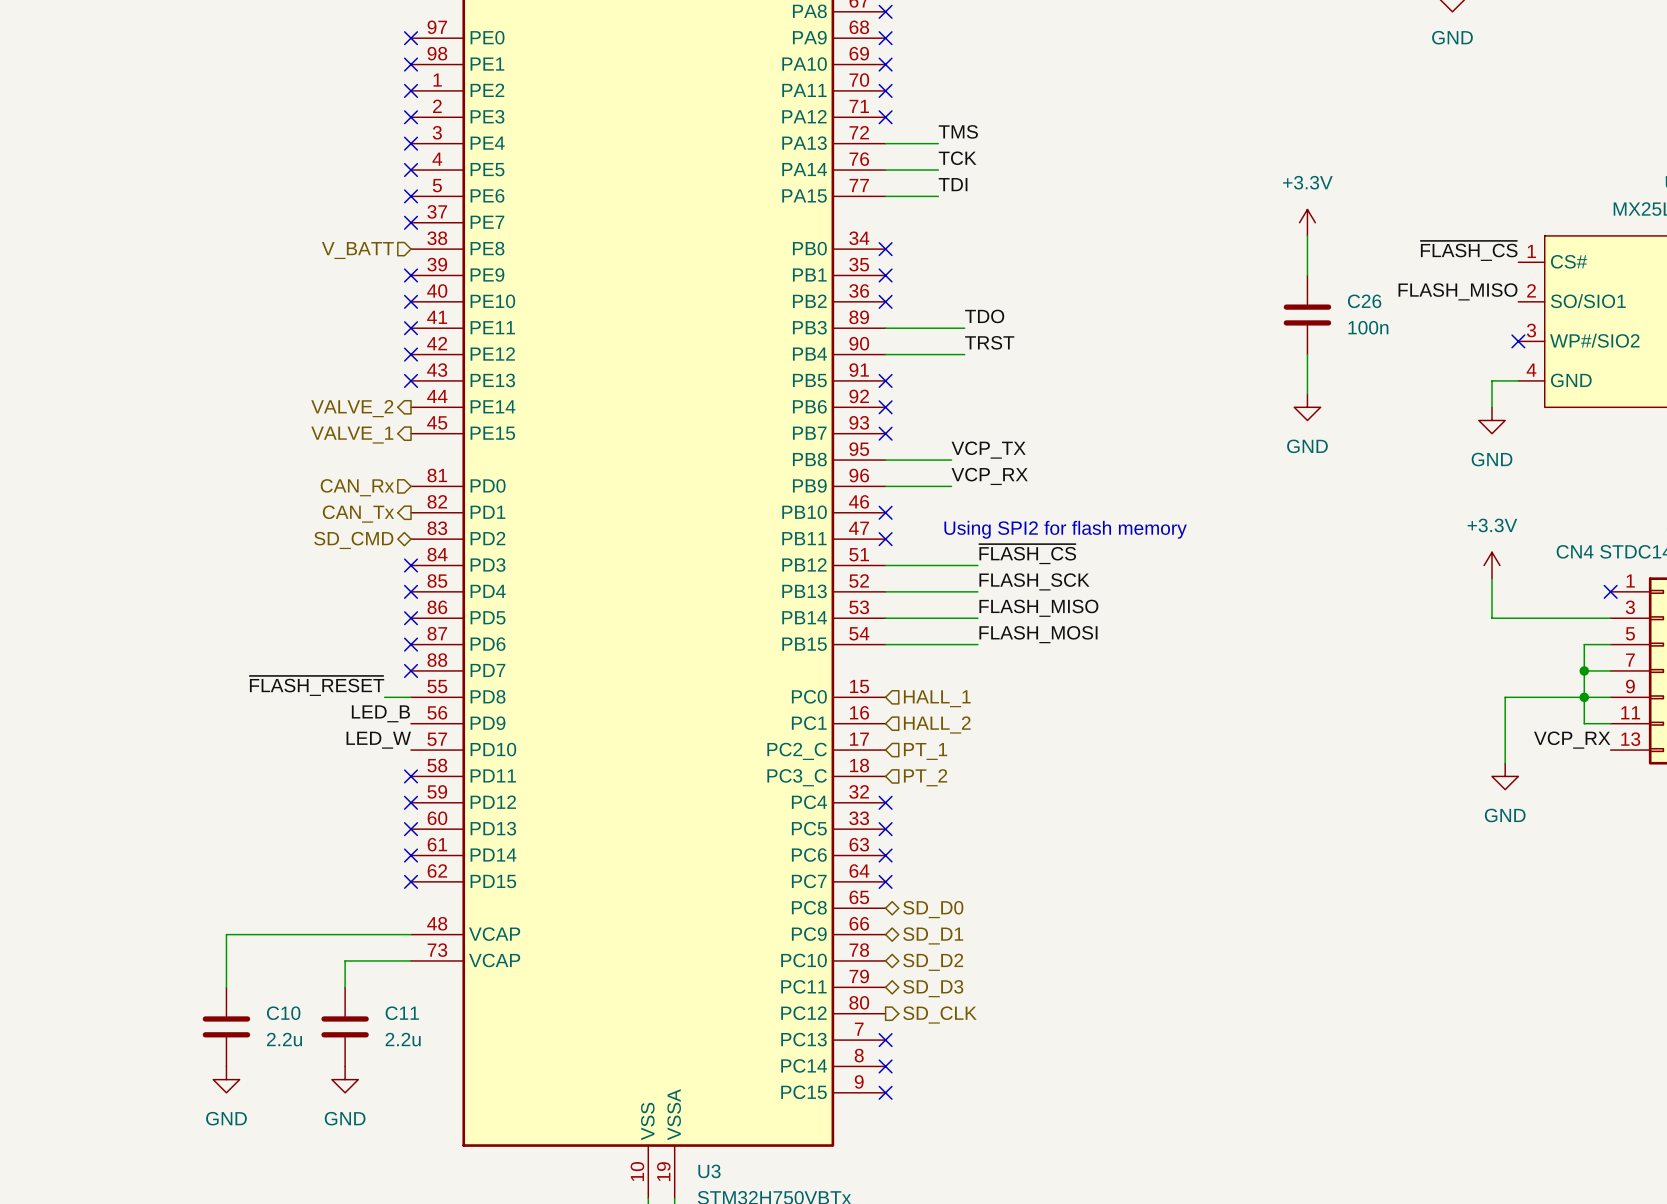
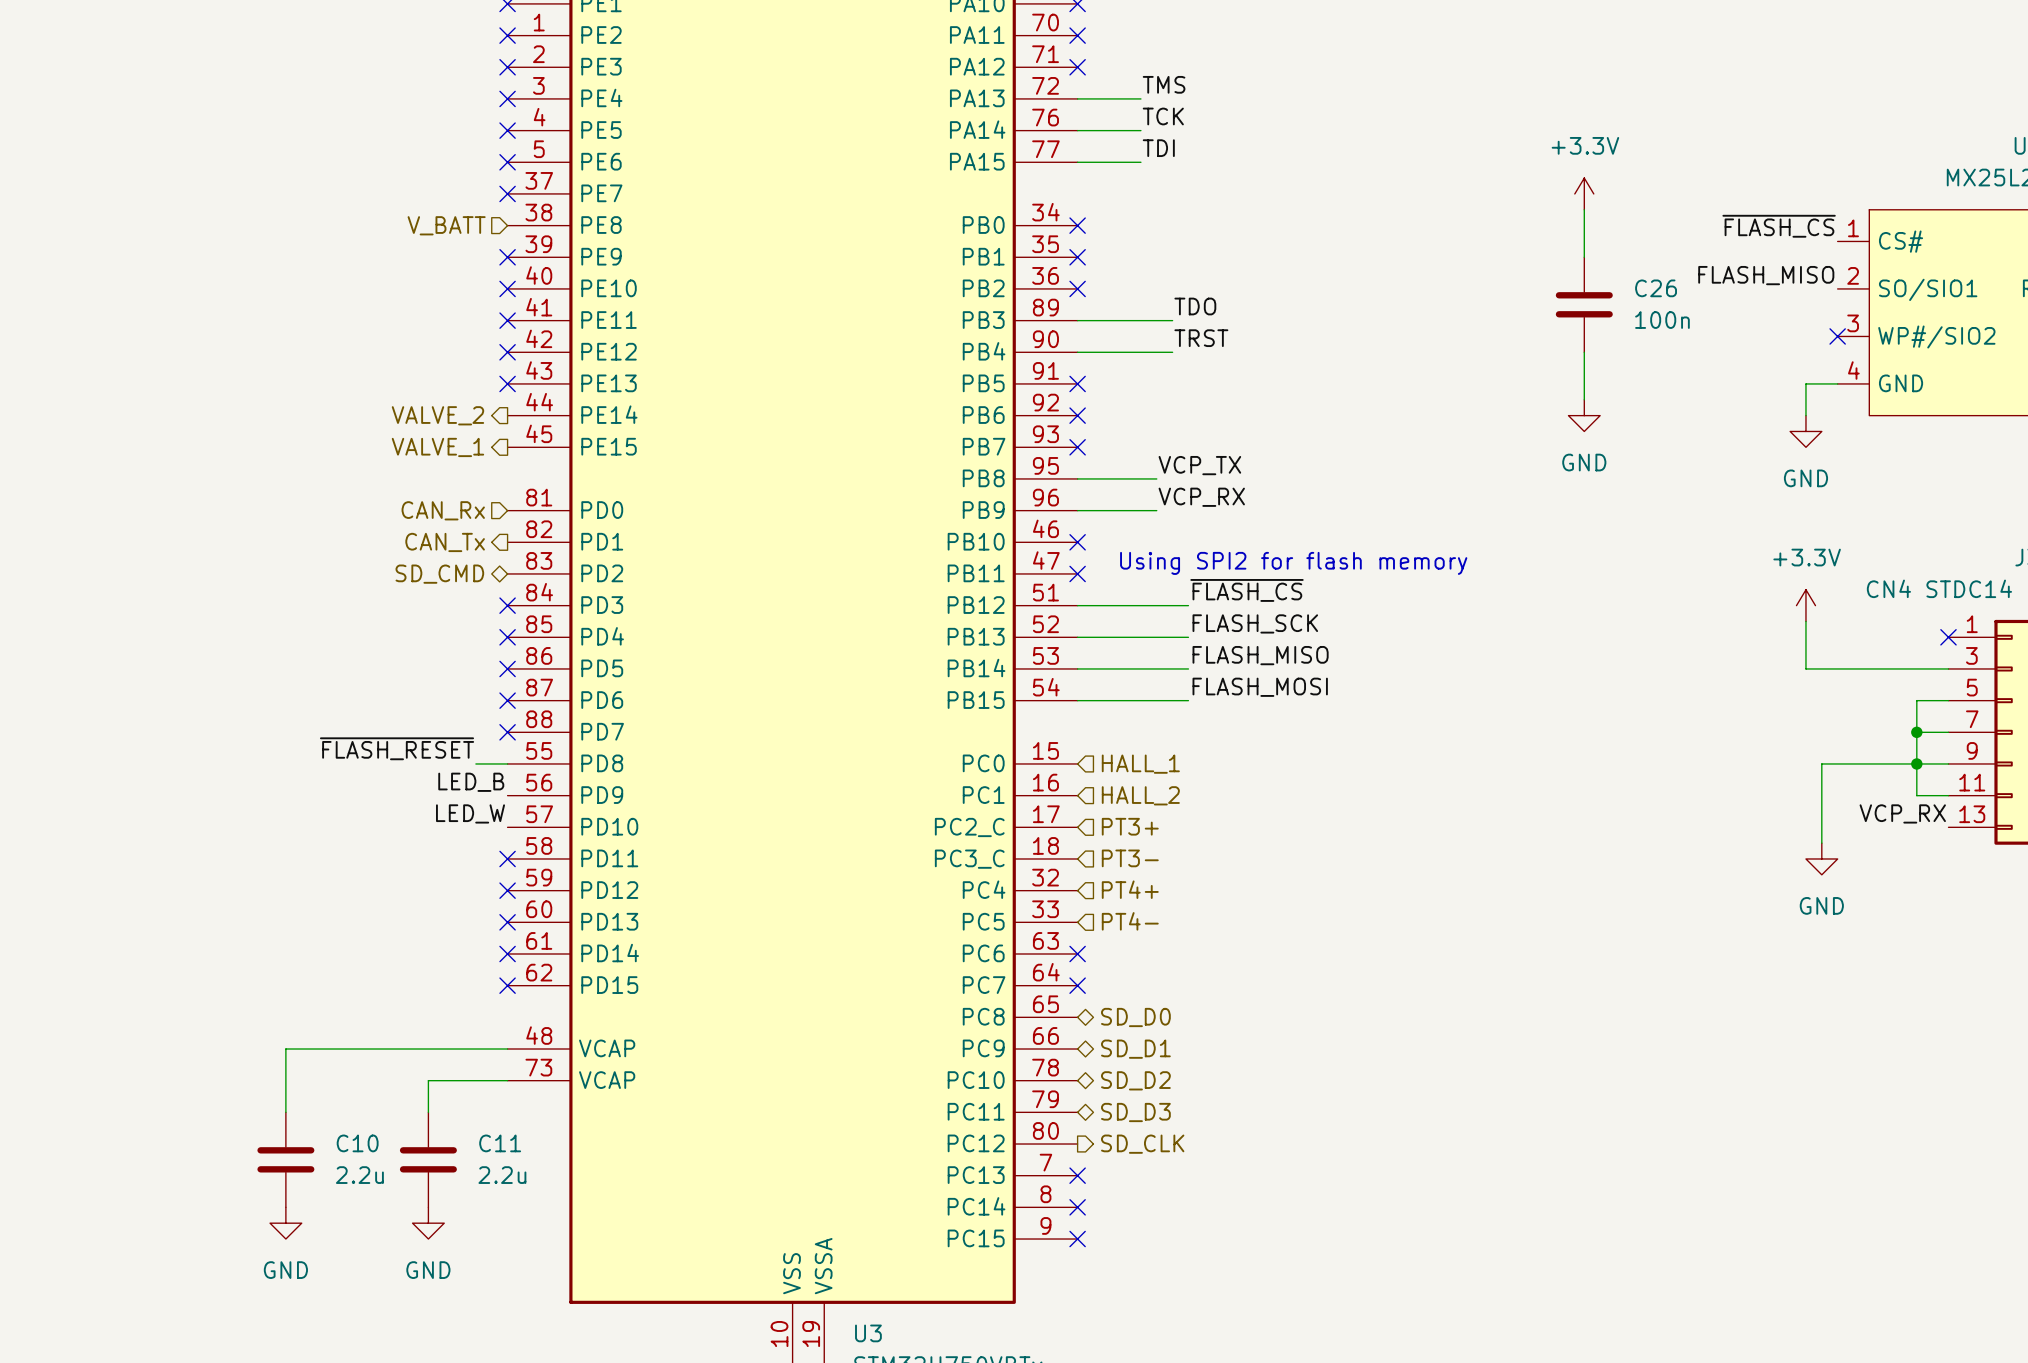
hierarchical label: PT_1 (925, 751) -> PT3+ (1130, 826)
hierarchical label: PT_2 (925, 777) -> PT3- (1130, 858)
no-connect mark: (885, 802) -> none
hierarchical label: none -> PT4+ (1130, 889)
hierarchical label: none -> PT4- (1130, 921)
no-connect mark: (885, 829) -> none

